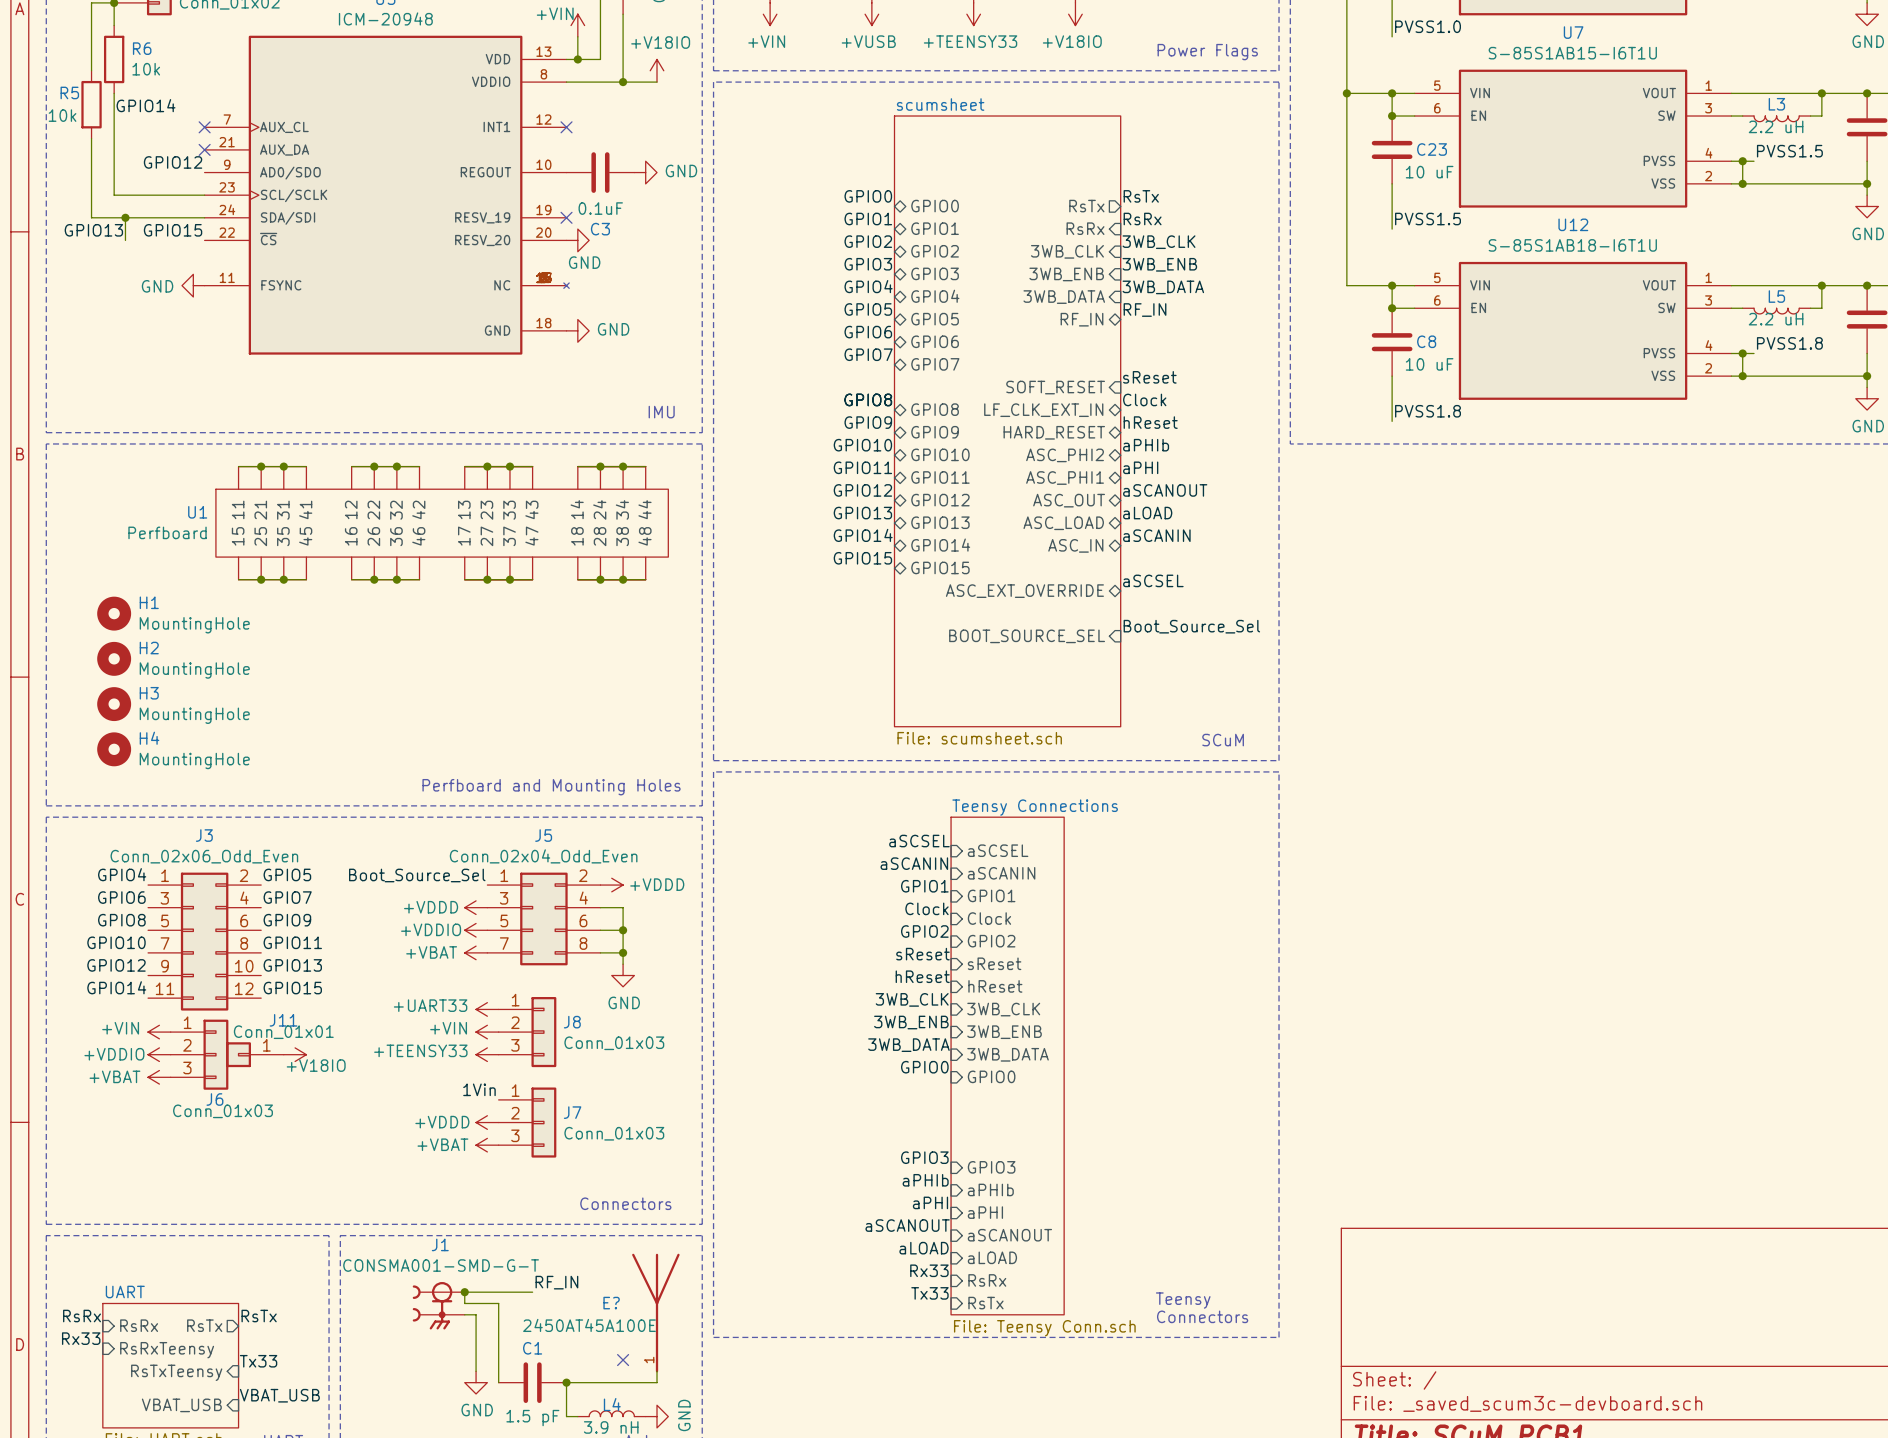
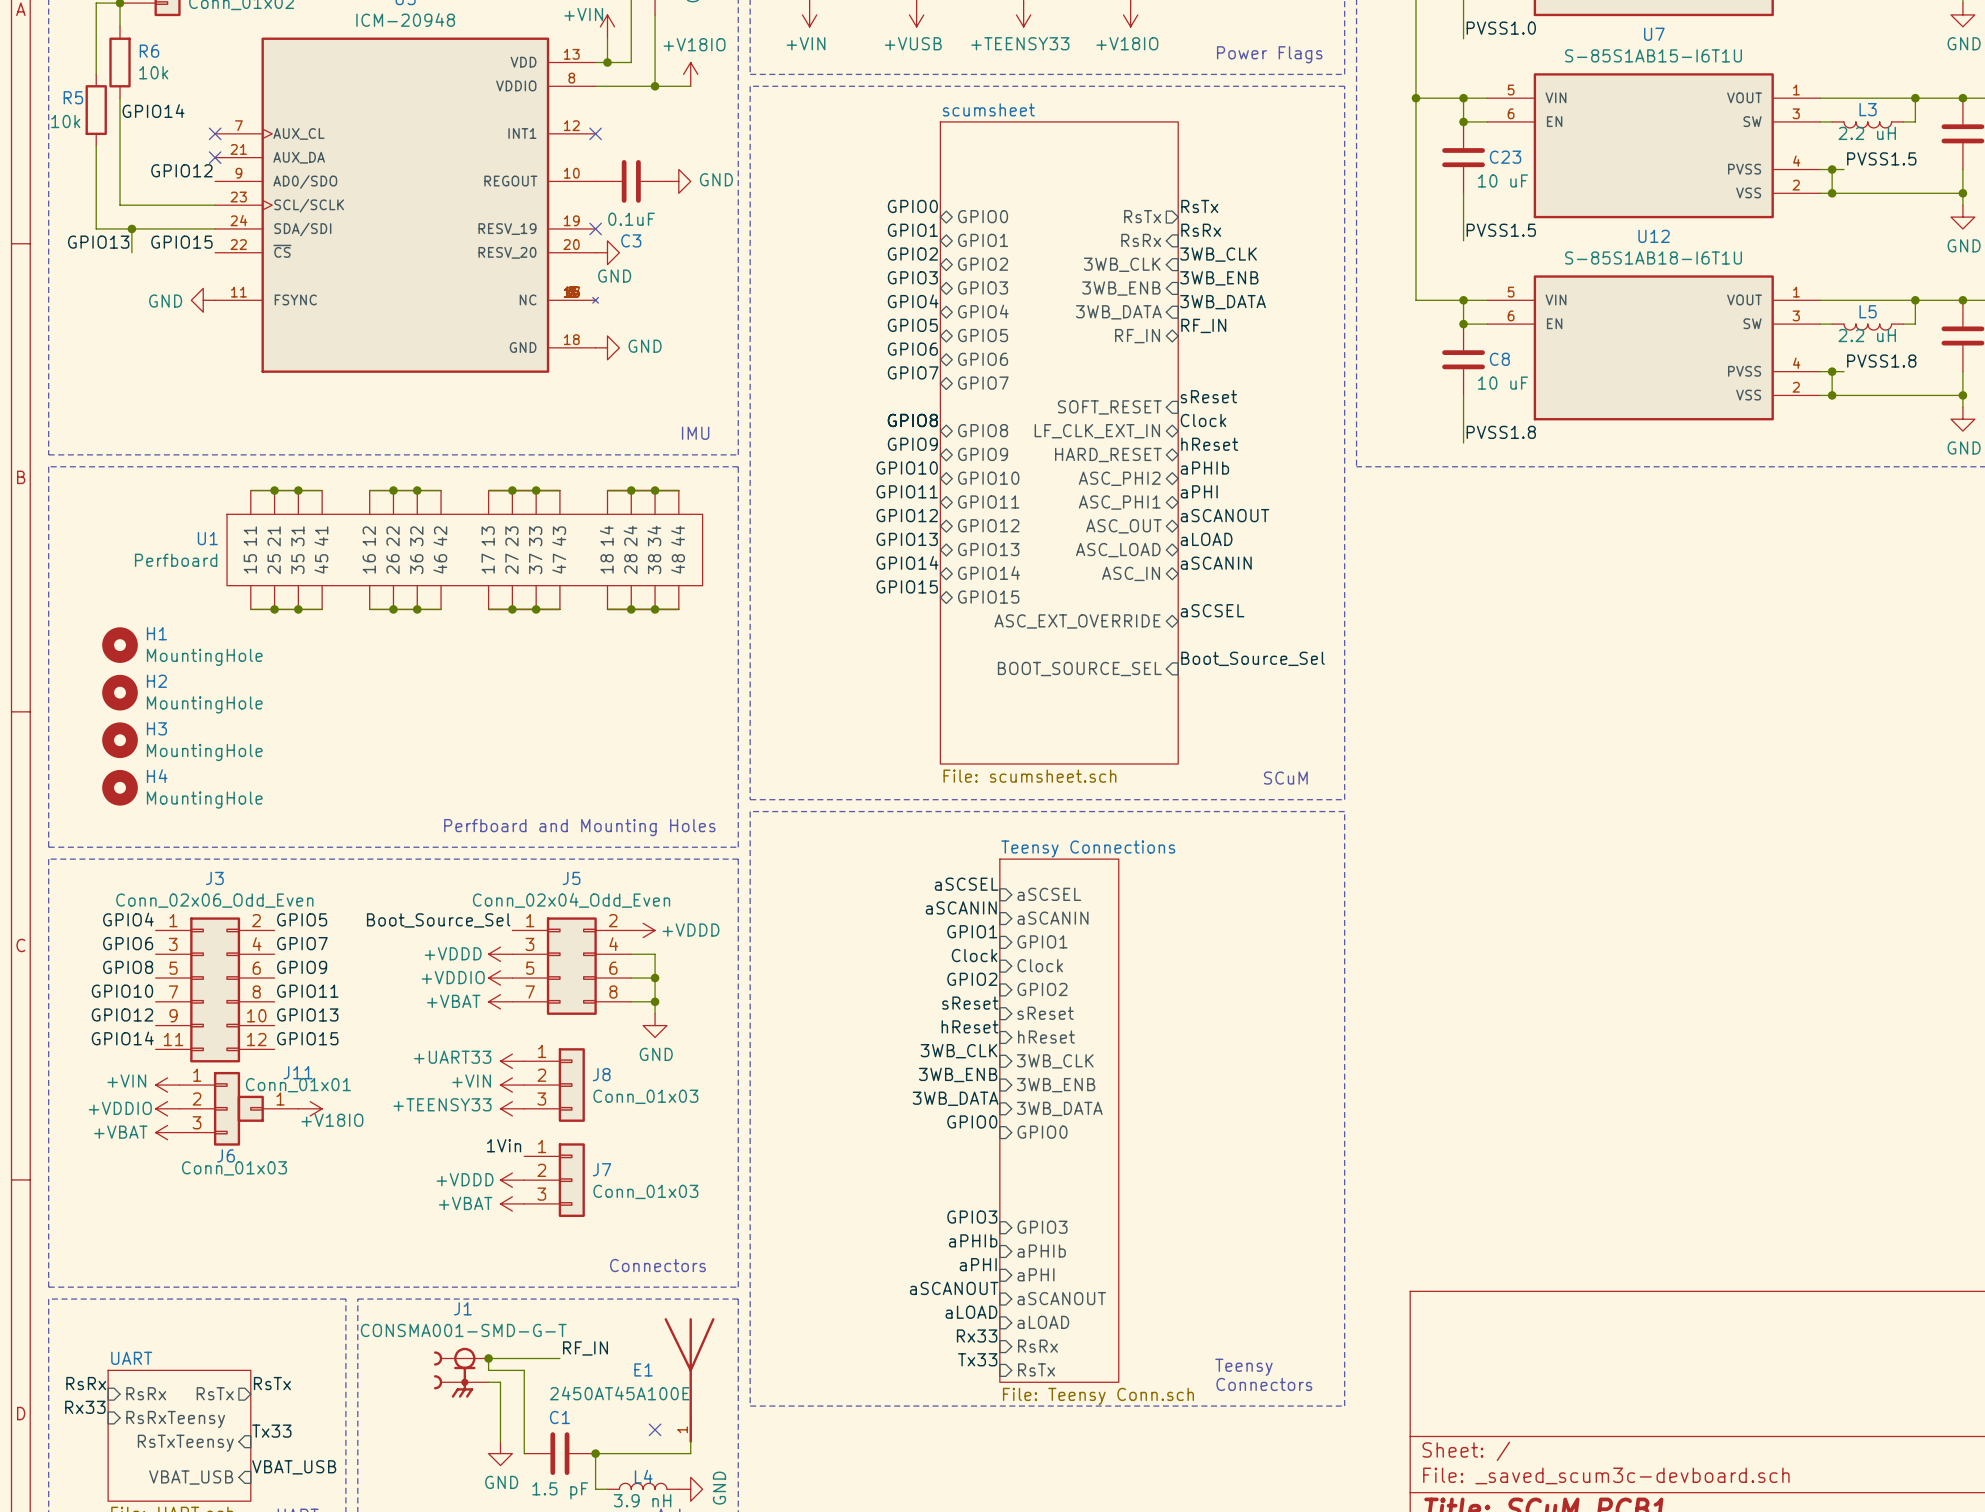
E? name: E? (611, 1303) -> E1 (643, 1369)

